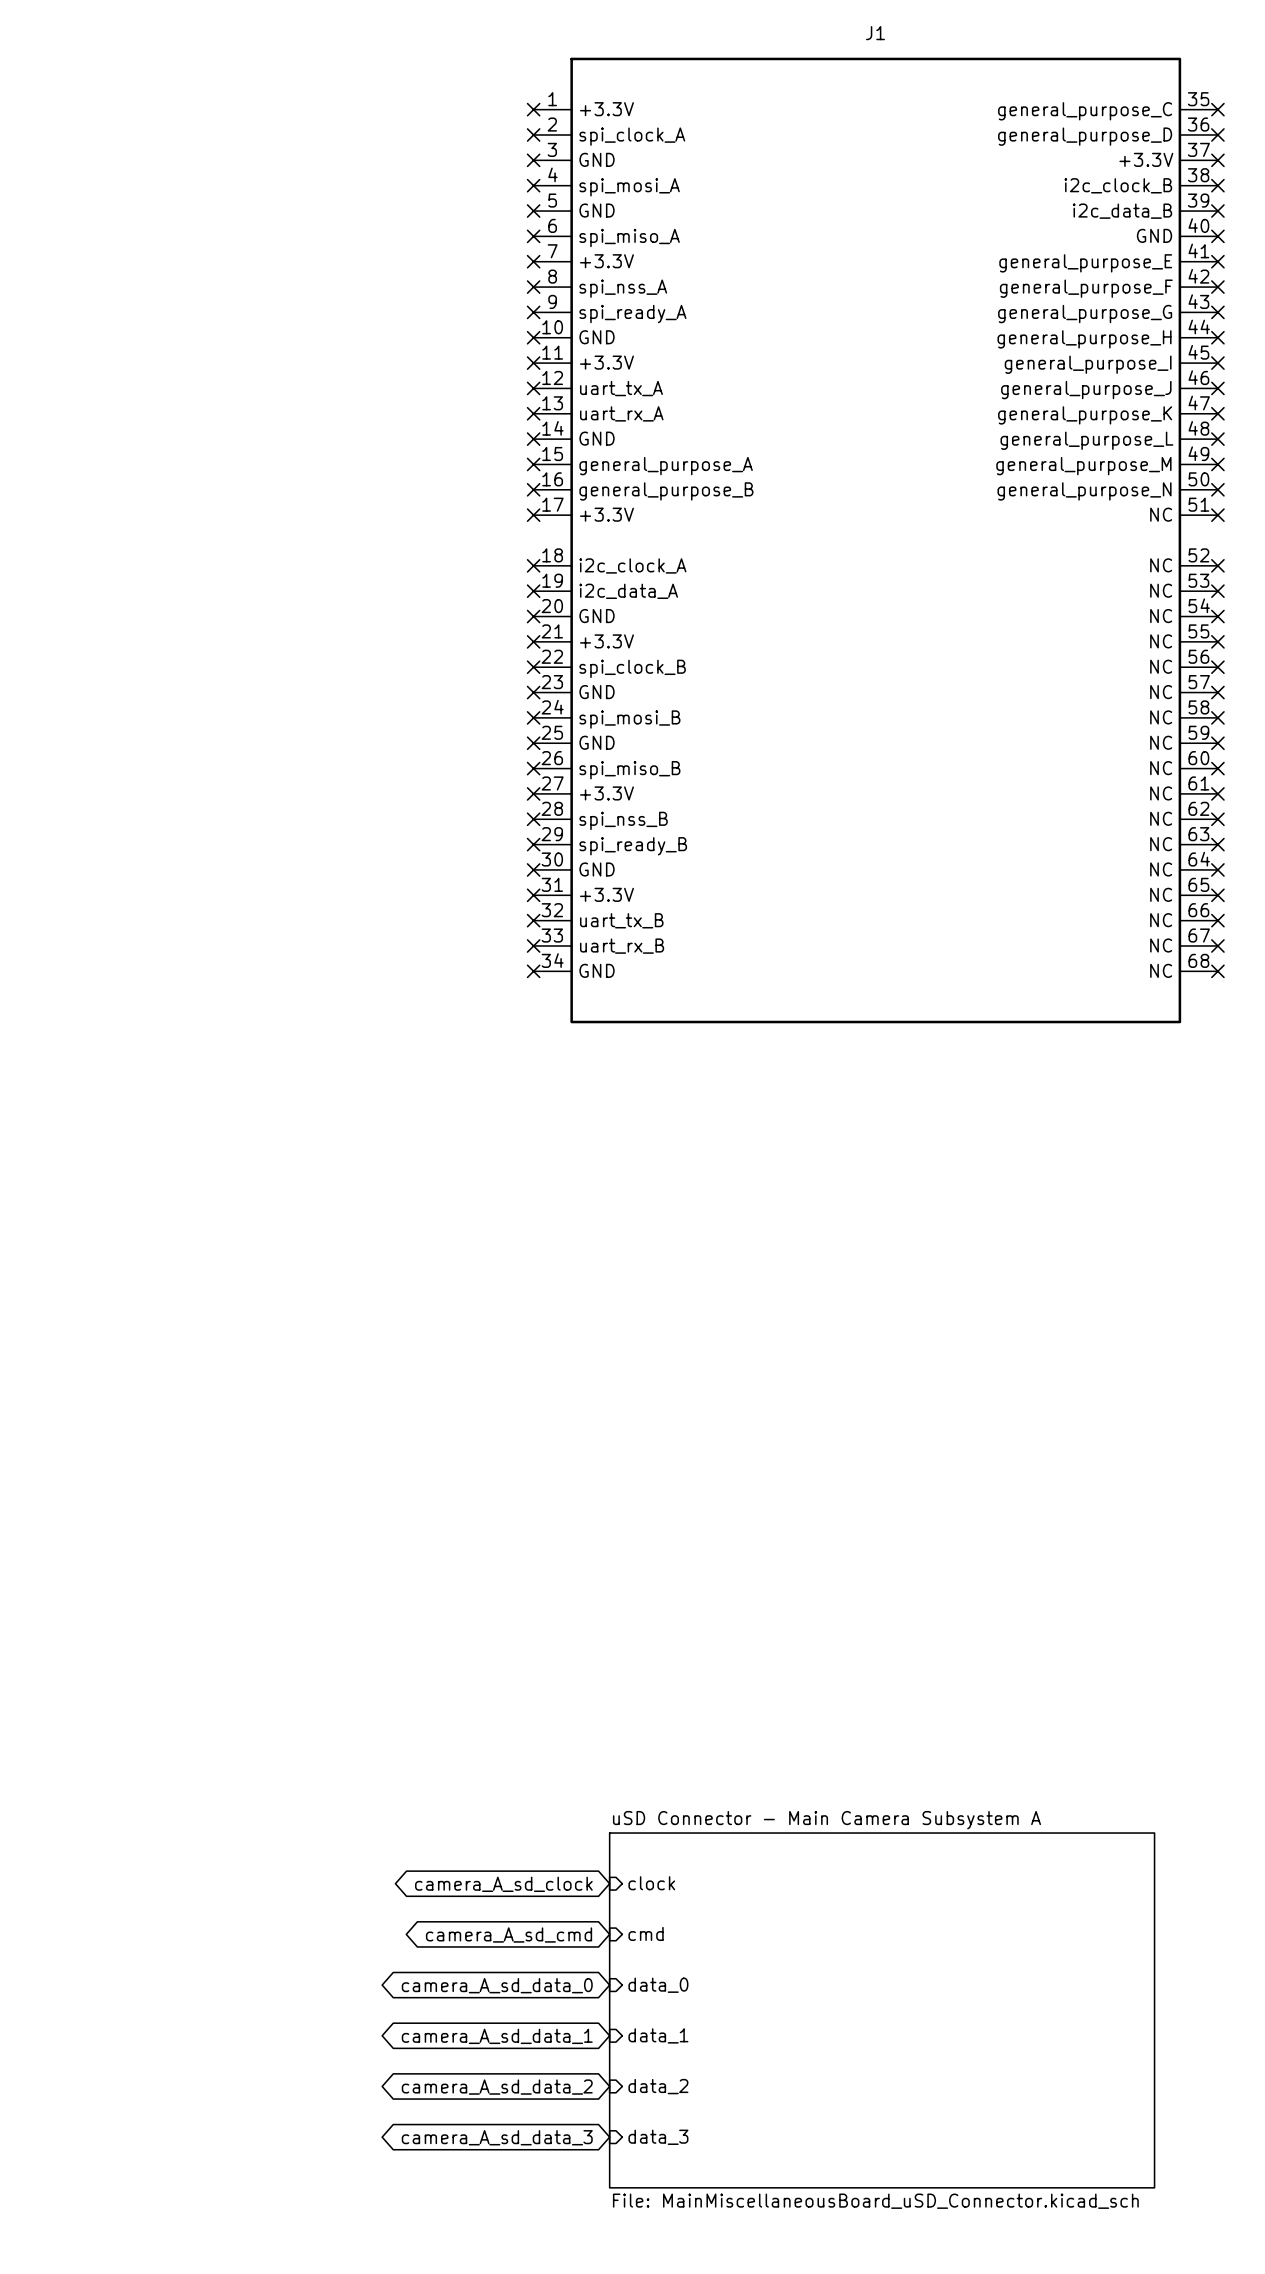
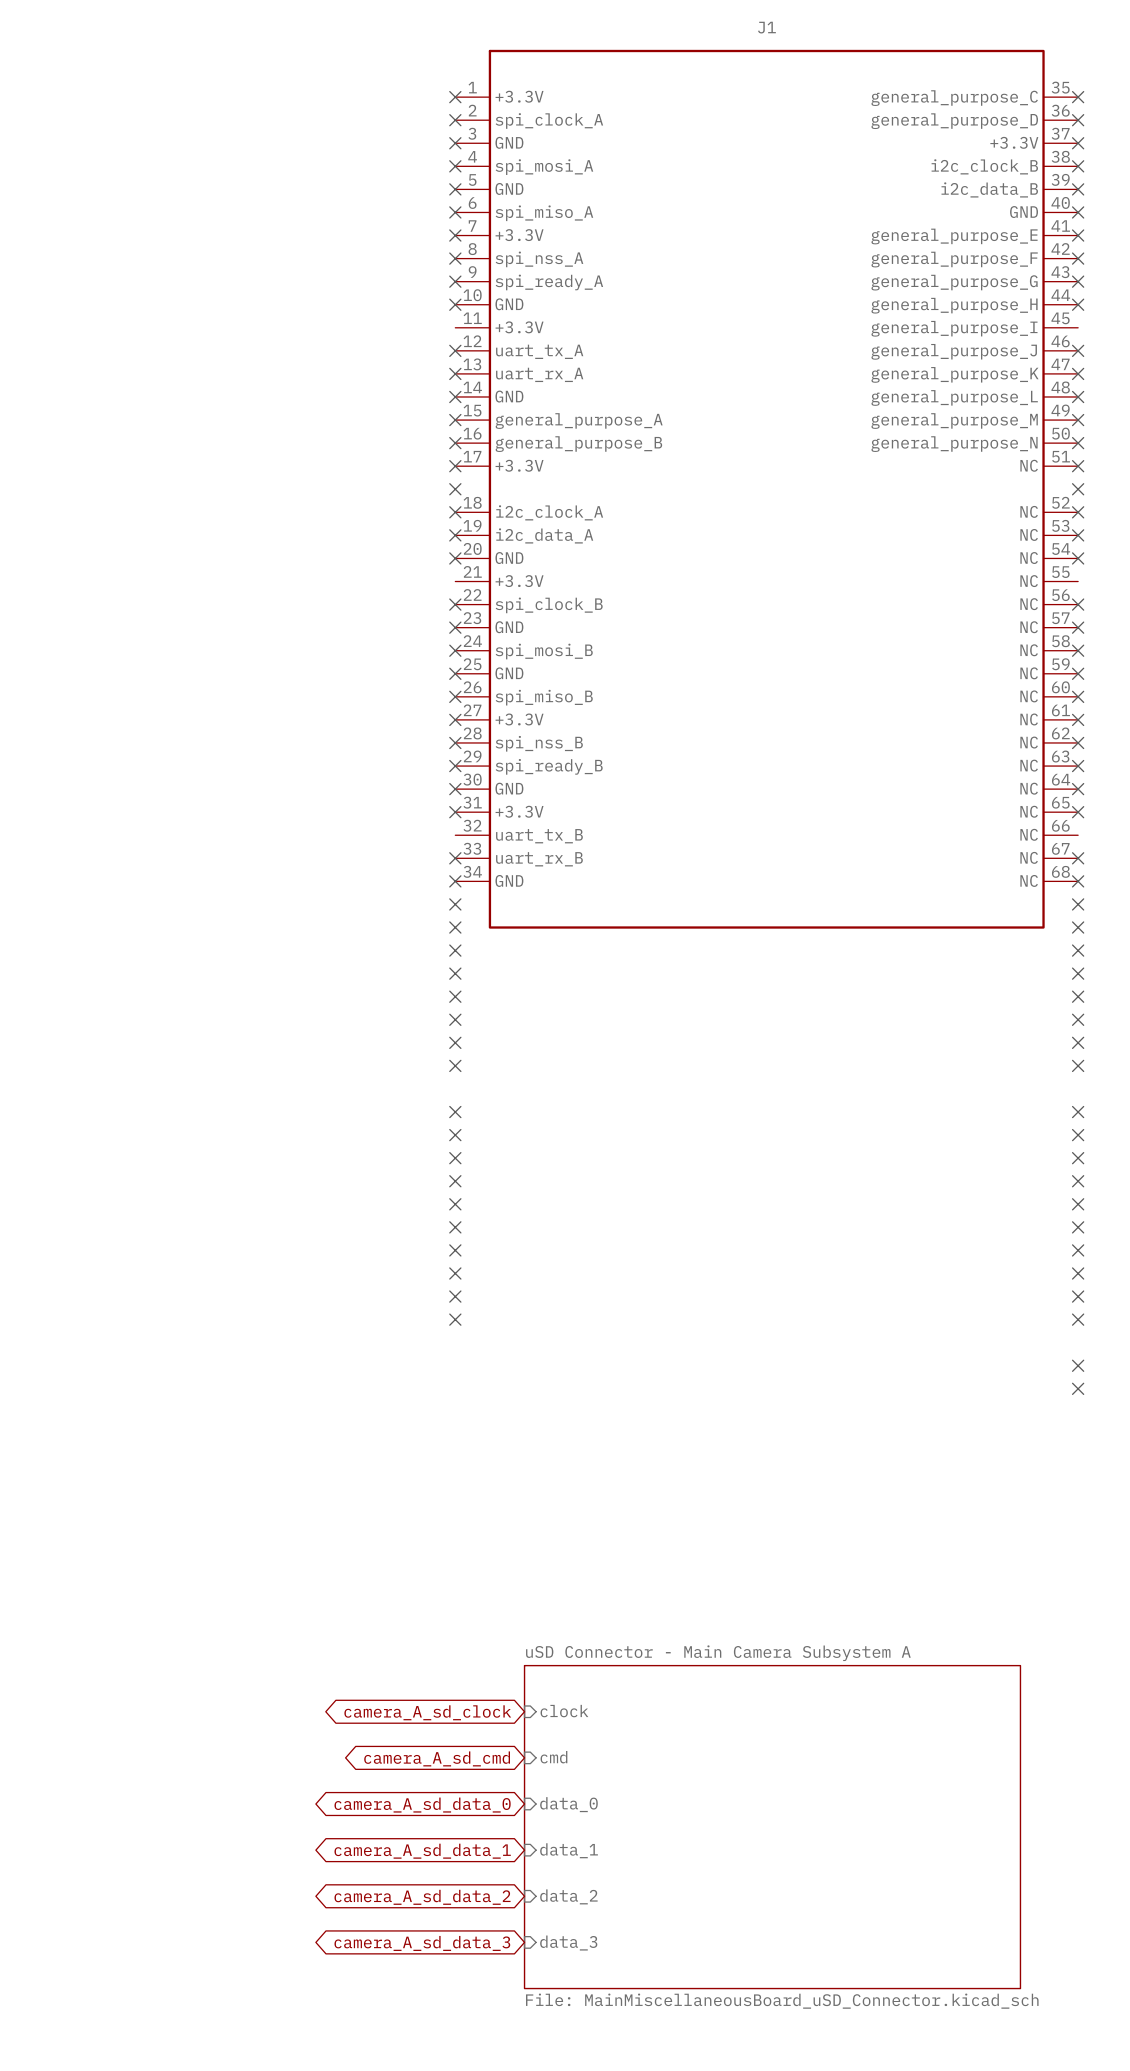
no-connect mark: (533, 363) -> none
no-connect mark: (1217, 363) -> none
no-connect mark: none -> (455, 489)
no-connect mark: none -> (1078, 489)
no-connect mark: (533, 641) -> none
no-connect mark: (1217, 641) -> none
no-connect mark: (533, 920) -> none
no-connect mark: (1217, 920) -> none
no-connect mark: none -> (455, 904)
no-connect mark: none -> (1078, 904)
no-connect mark: none -> (455, 927)
no-connect mark: none -> (1078, 927)
no-connect mark: none -> (455, 950)
no-connect mark: none -> (1078, 950)
no-connect mark: none -> (455, 973)
no-connect mark: none -> (1078, 973)
no-connect mark: none -> (455, 996)
no-connect mark: none -> (1078, 996)
no-connect mark: none -> (455, 1019)
no-connect mark: none -> (1078, 1019)
no-connect mark: none -> (455, 1042)
no-connect mark: none -> (1078, 1042)
no-connect mark: none -> (455, 1065)
no-connect mark: none -> (1078, 1065)
no-connect mark: none -> (455, 1112)
no-connect mark: none -> (1078, 1112)
no-connect mark: none -> (455, 1135)
no-connect mark: none -> (1078, 1135)
no-connect mark: none -> (455, 1158)
no-connect mark: none -> (1078, 1158)
no-connect mark: none -> (455, 1181)
no-connect mark: none -> (1078, 1181)
no-connect mark: none -> (455, 1204)
no-connect mark: none -> (1078, 1204)
no-connect mark: none -> (455, 1227)
no-connect mark: none -> (1078, 1227)
no-connect mark: none -> (455, 1250)
no-connect mark: none -> (1078, 1250)
no-connect mark: none -> (455, 1273)
no-connect mark: none -> (1078, 1273)
no-connect mark: none -> (455, 1296)
no-connect mark: none -> (1078, 1296)
no-connect mark: none -> (455, 1319)
no-connect mark: none -> (1078, 1319)
no-connect mark: none -> (1078, 1365)
no-connect mark: none -> (1078, 1388)

